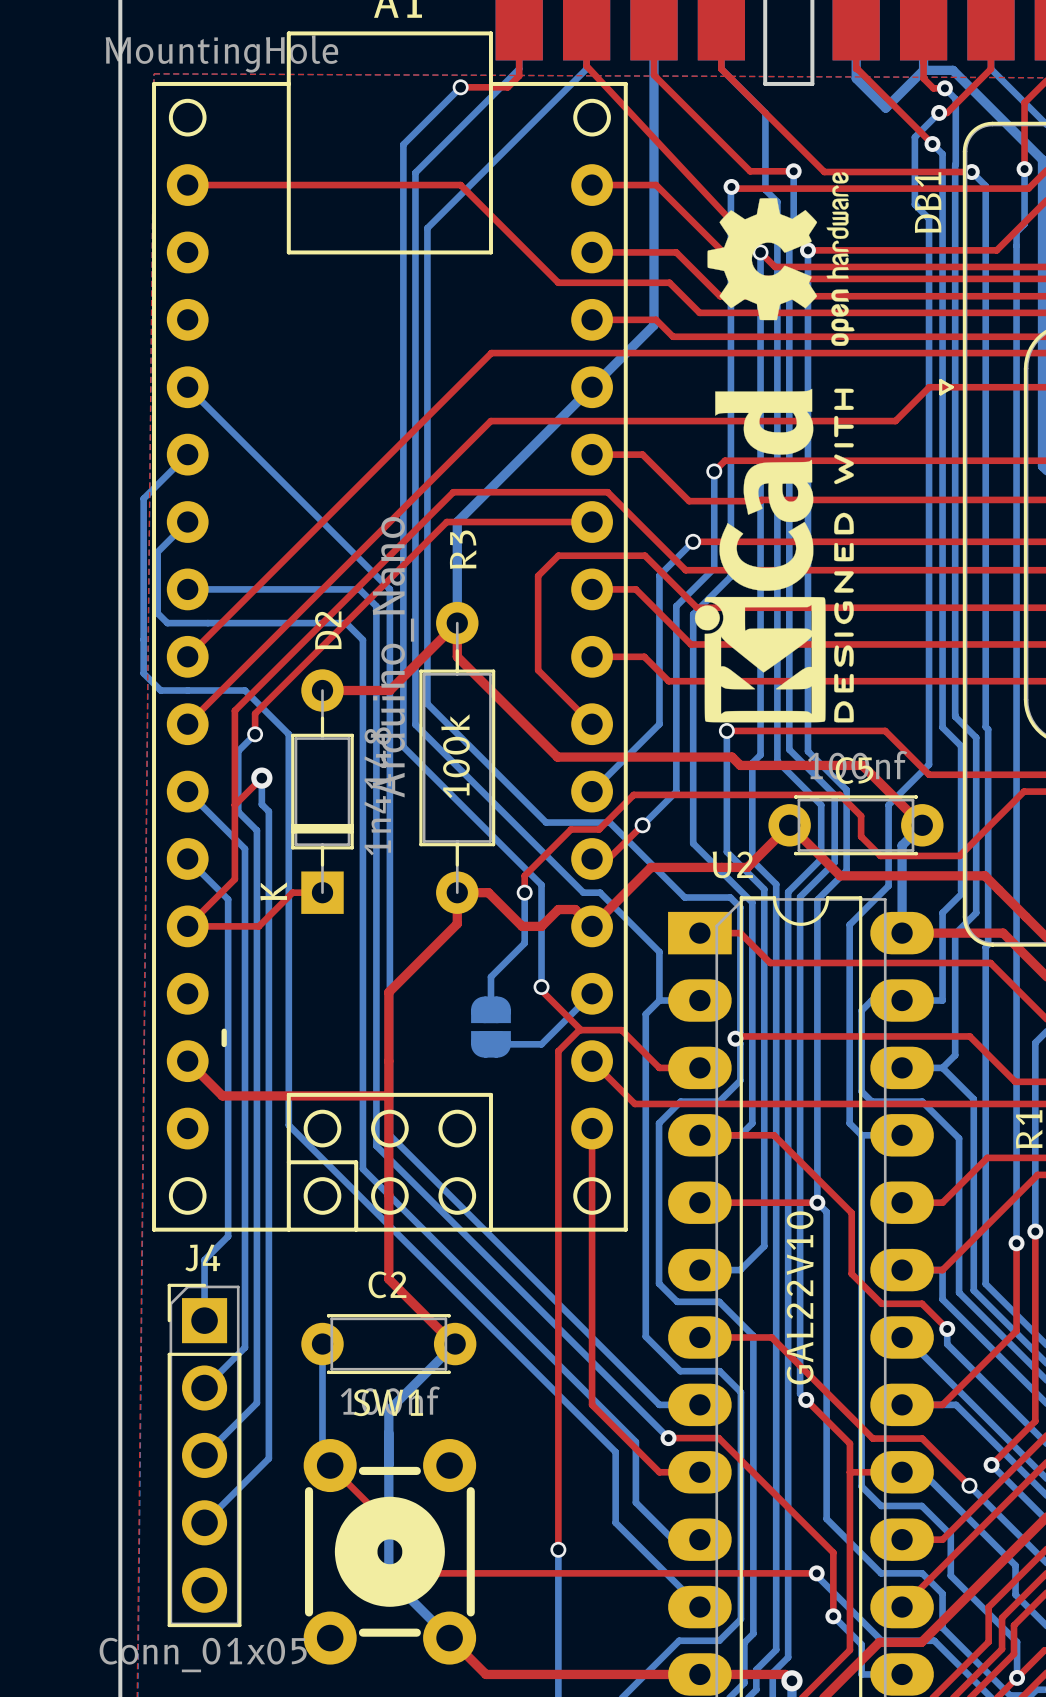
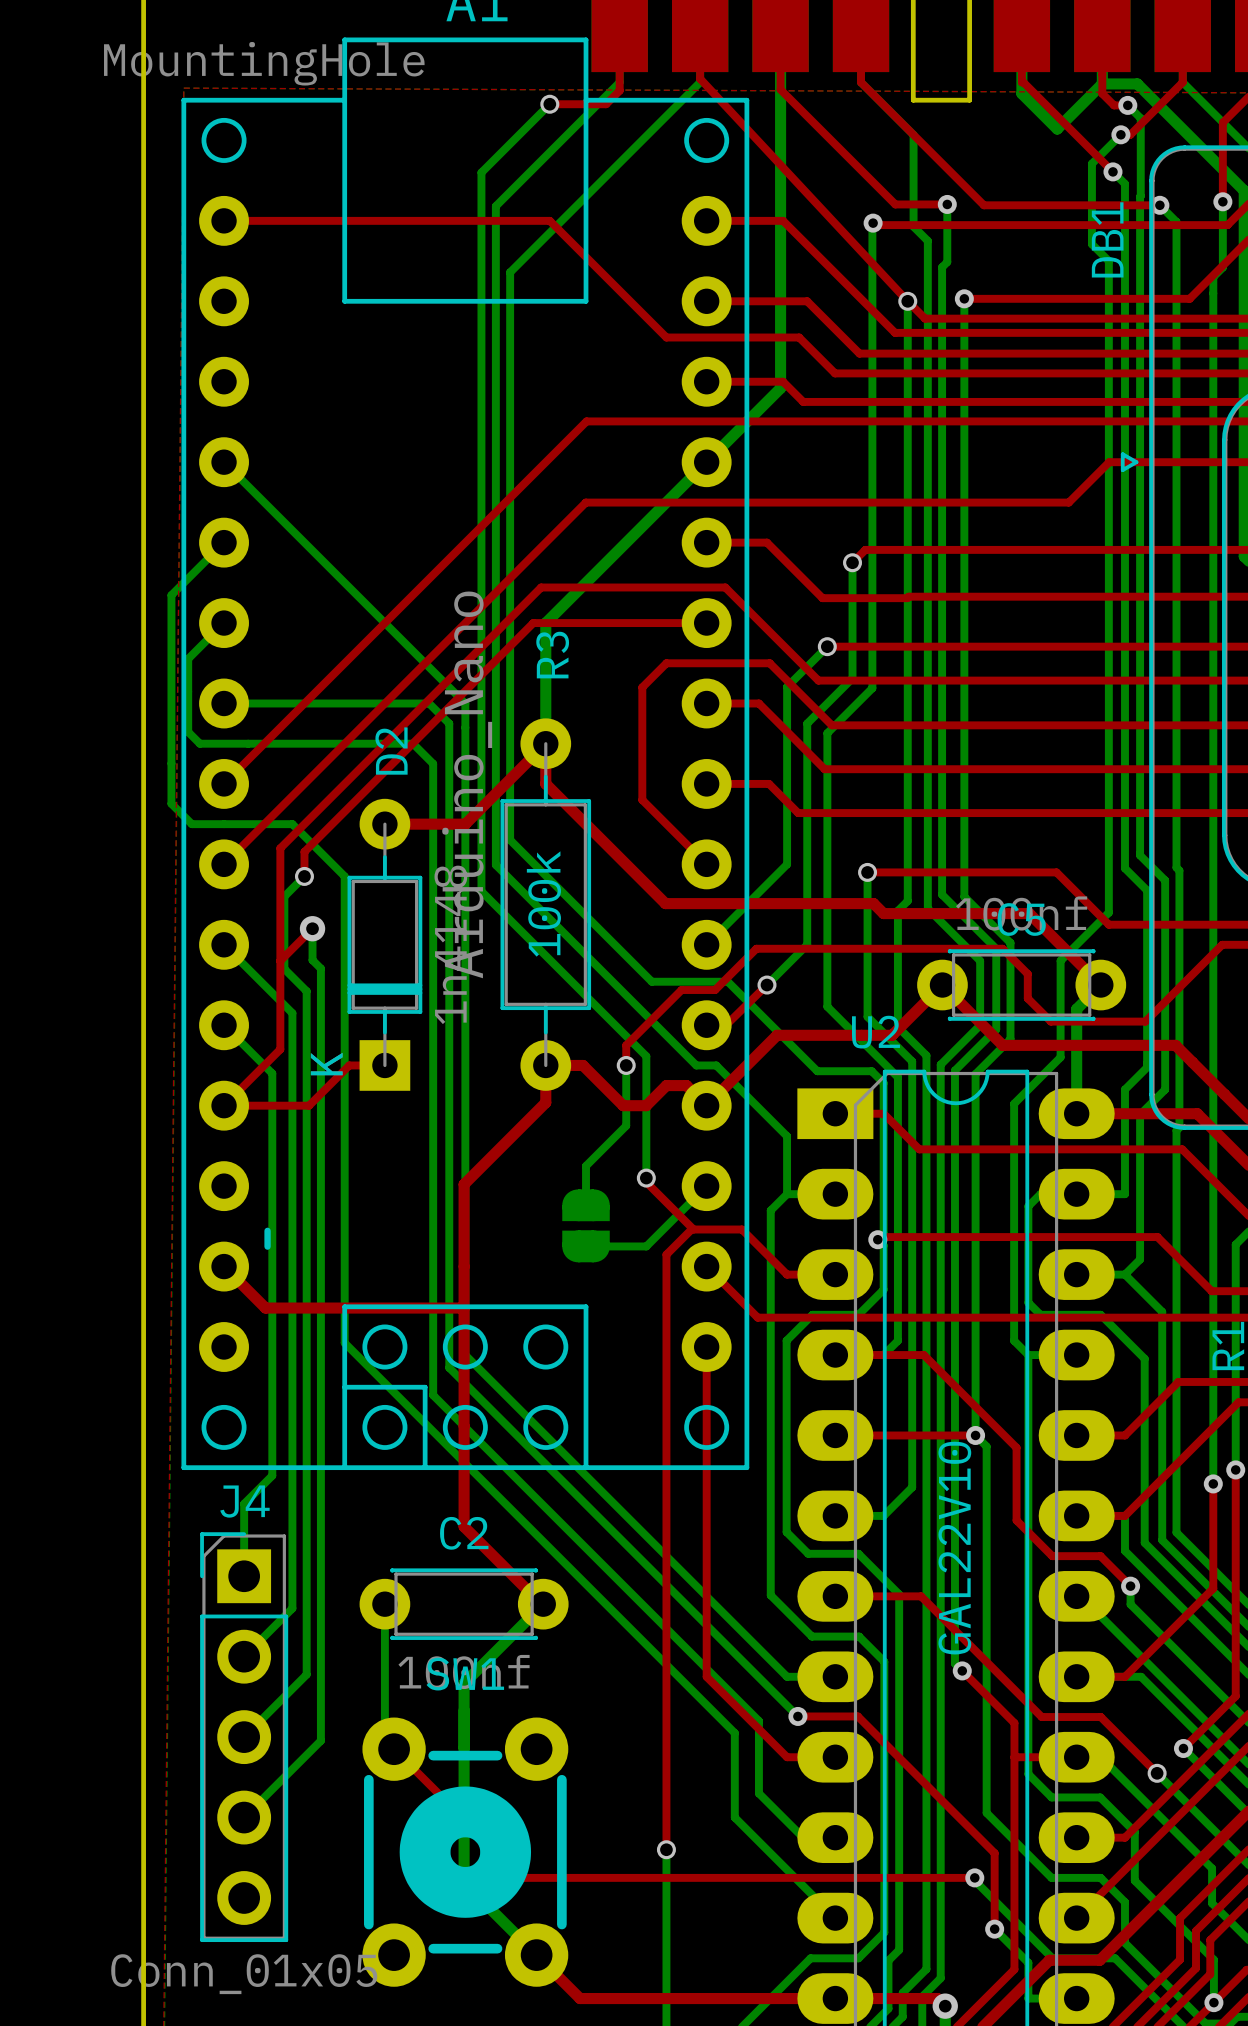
drawing: [707, 172, 855, 346] -> none
drawing: [694, 388, 854, 723] -> none

